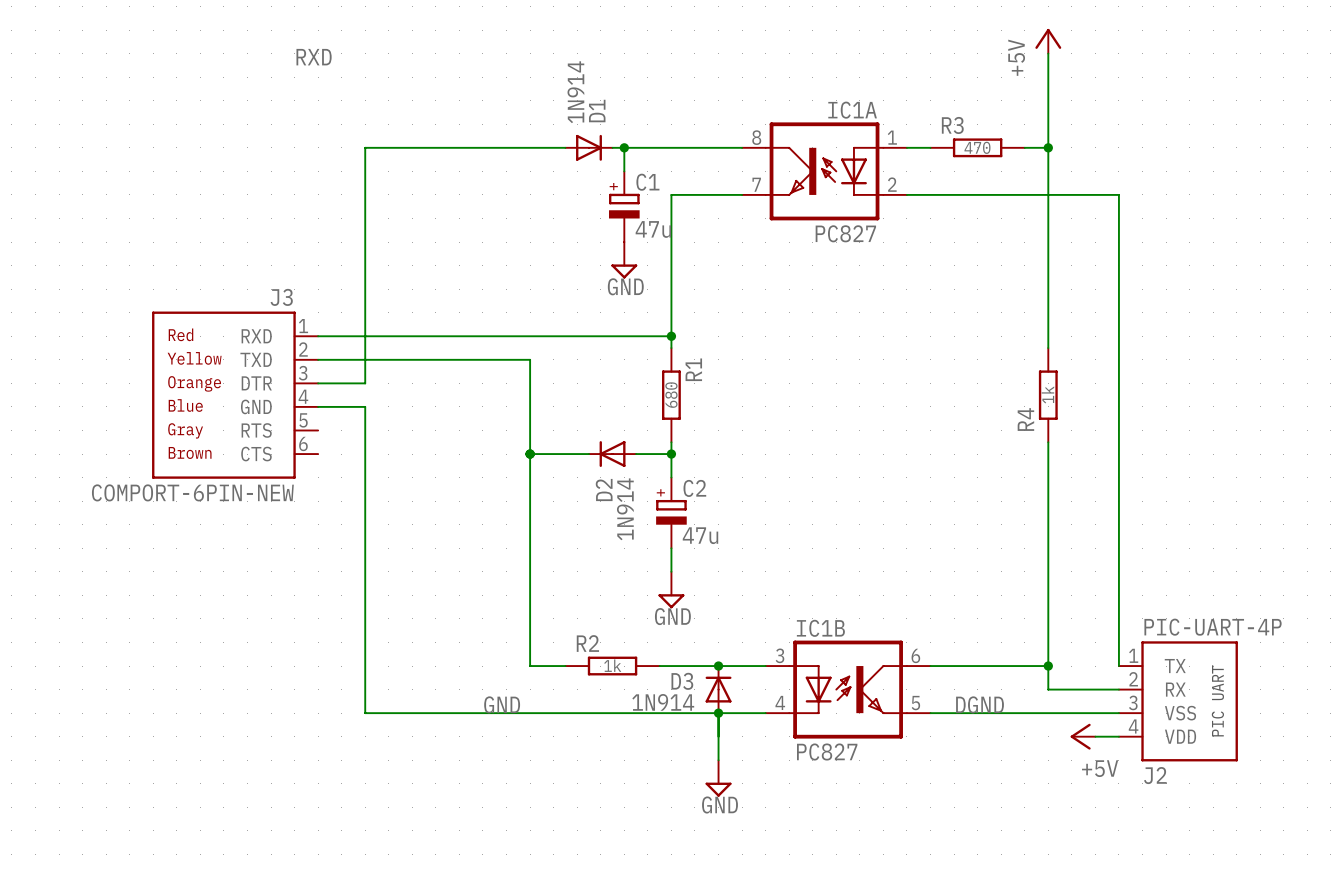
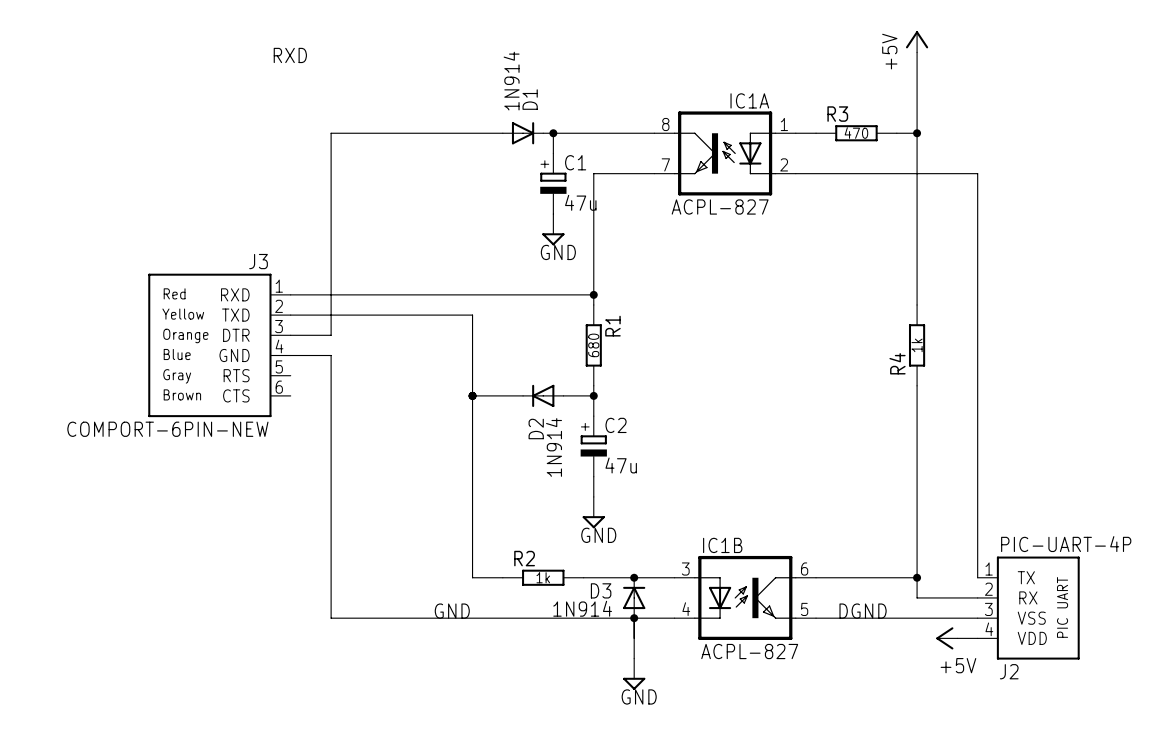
IC1A value: PC827 (845, 233) -> ACPL-827 (720, 206)
IC1B value: PC827 (827, 752) -> ACPL-827 (749, 651)

